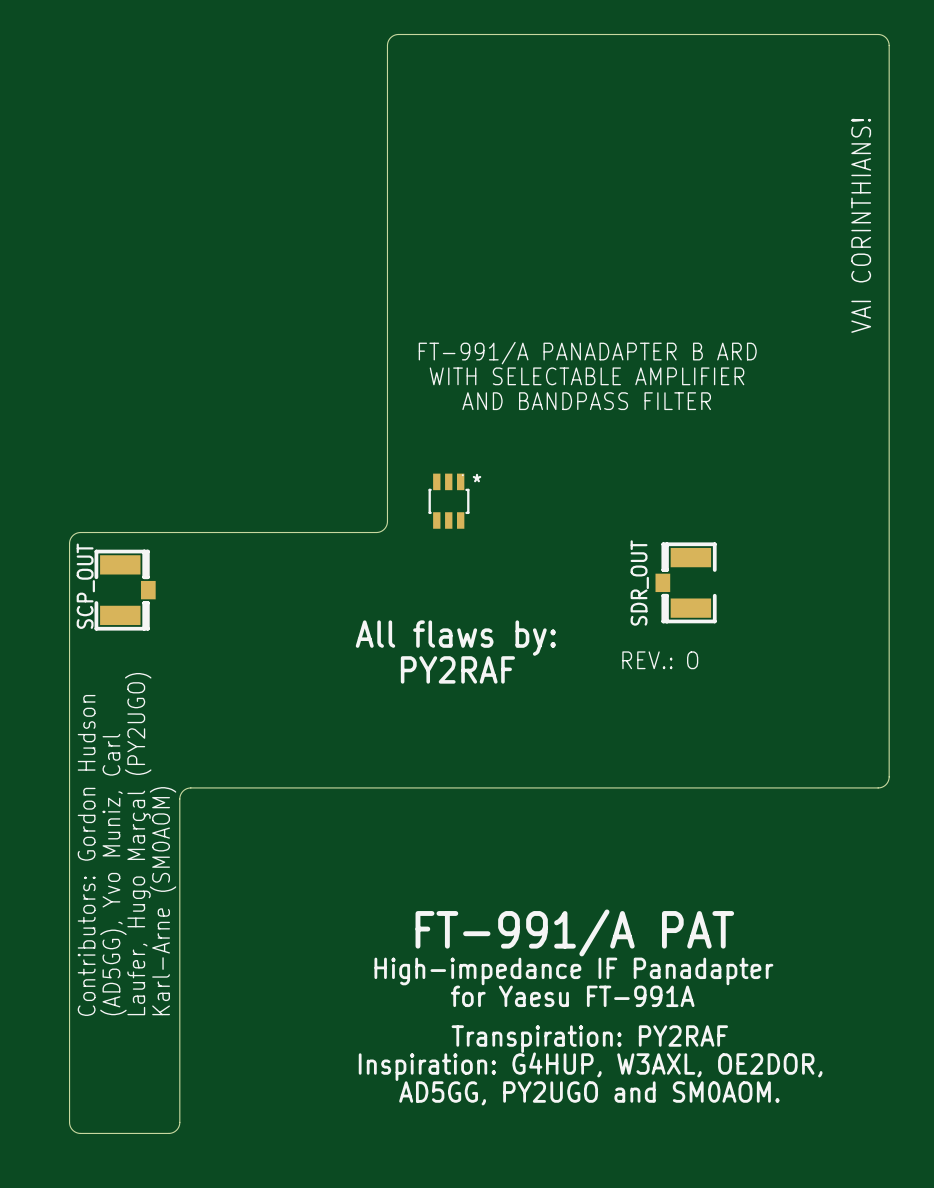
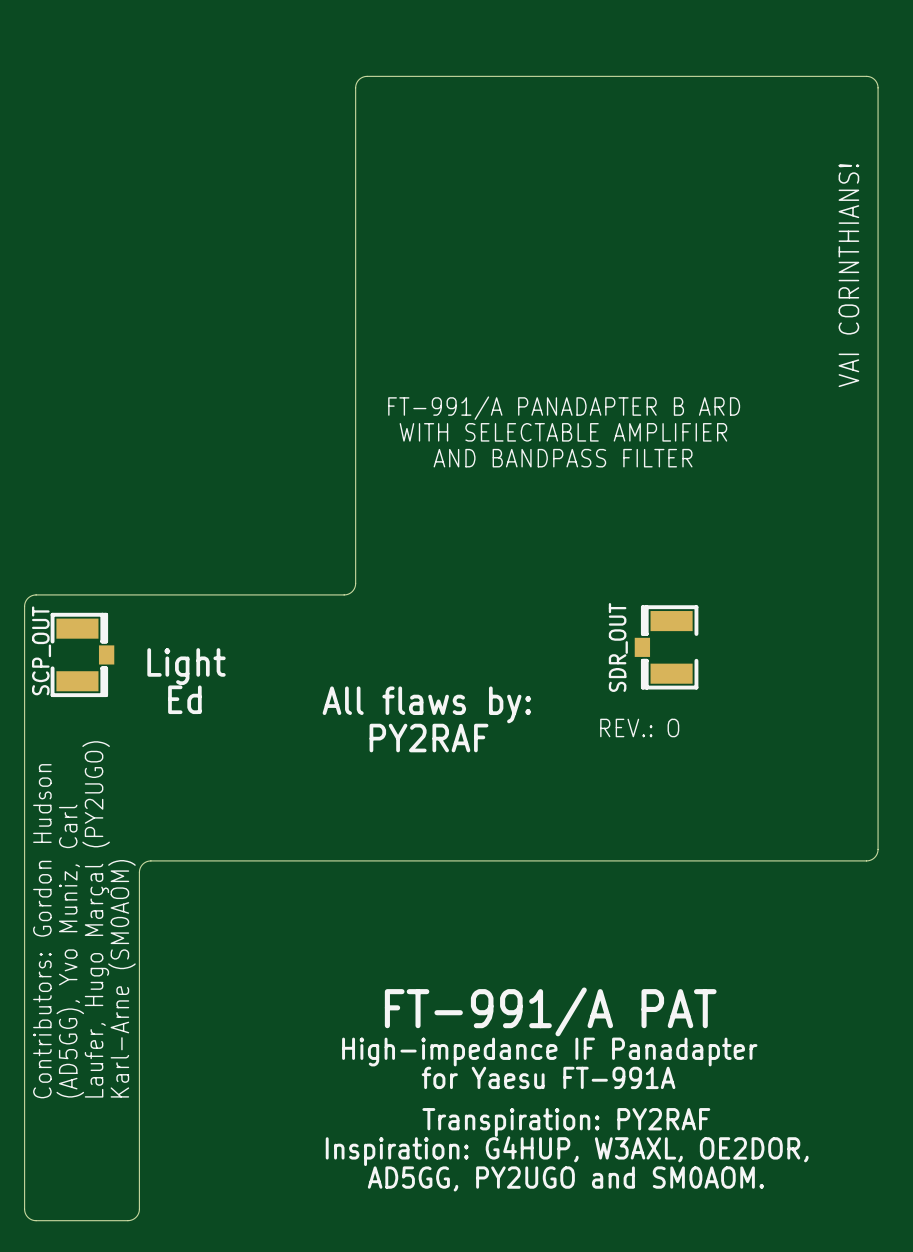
part: (449, 501) -> none
text: none -> Light (186, 666)
text: none -> Ed (184, 699)

